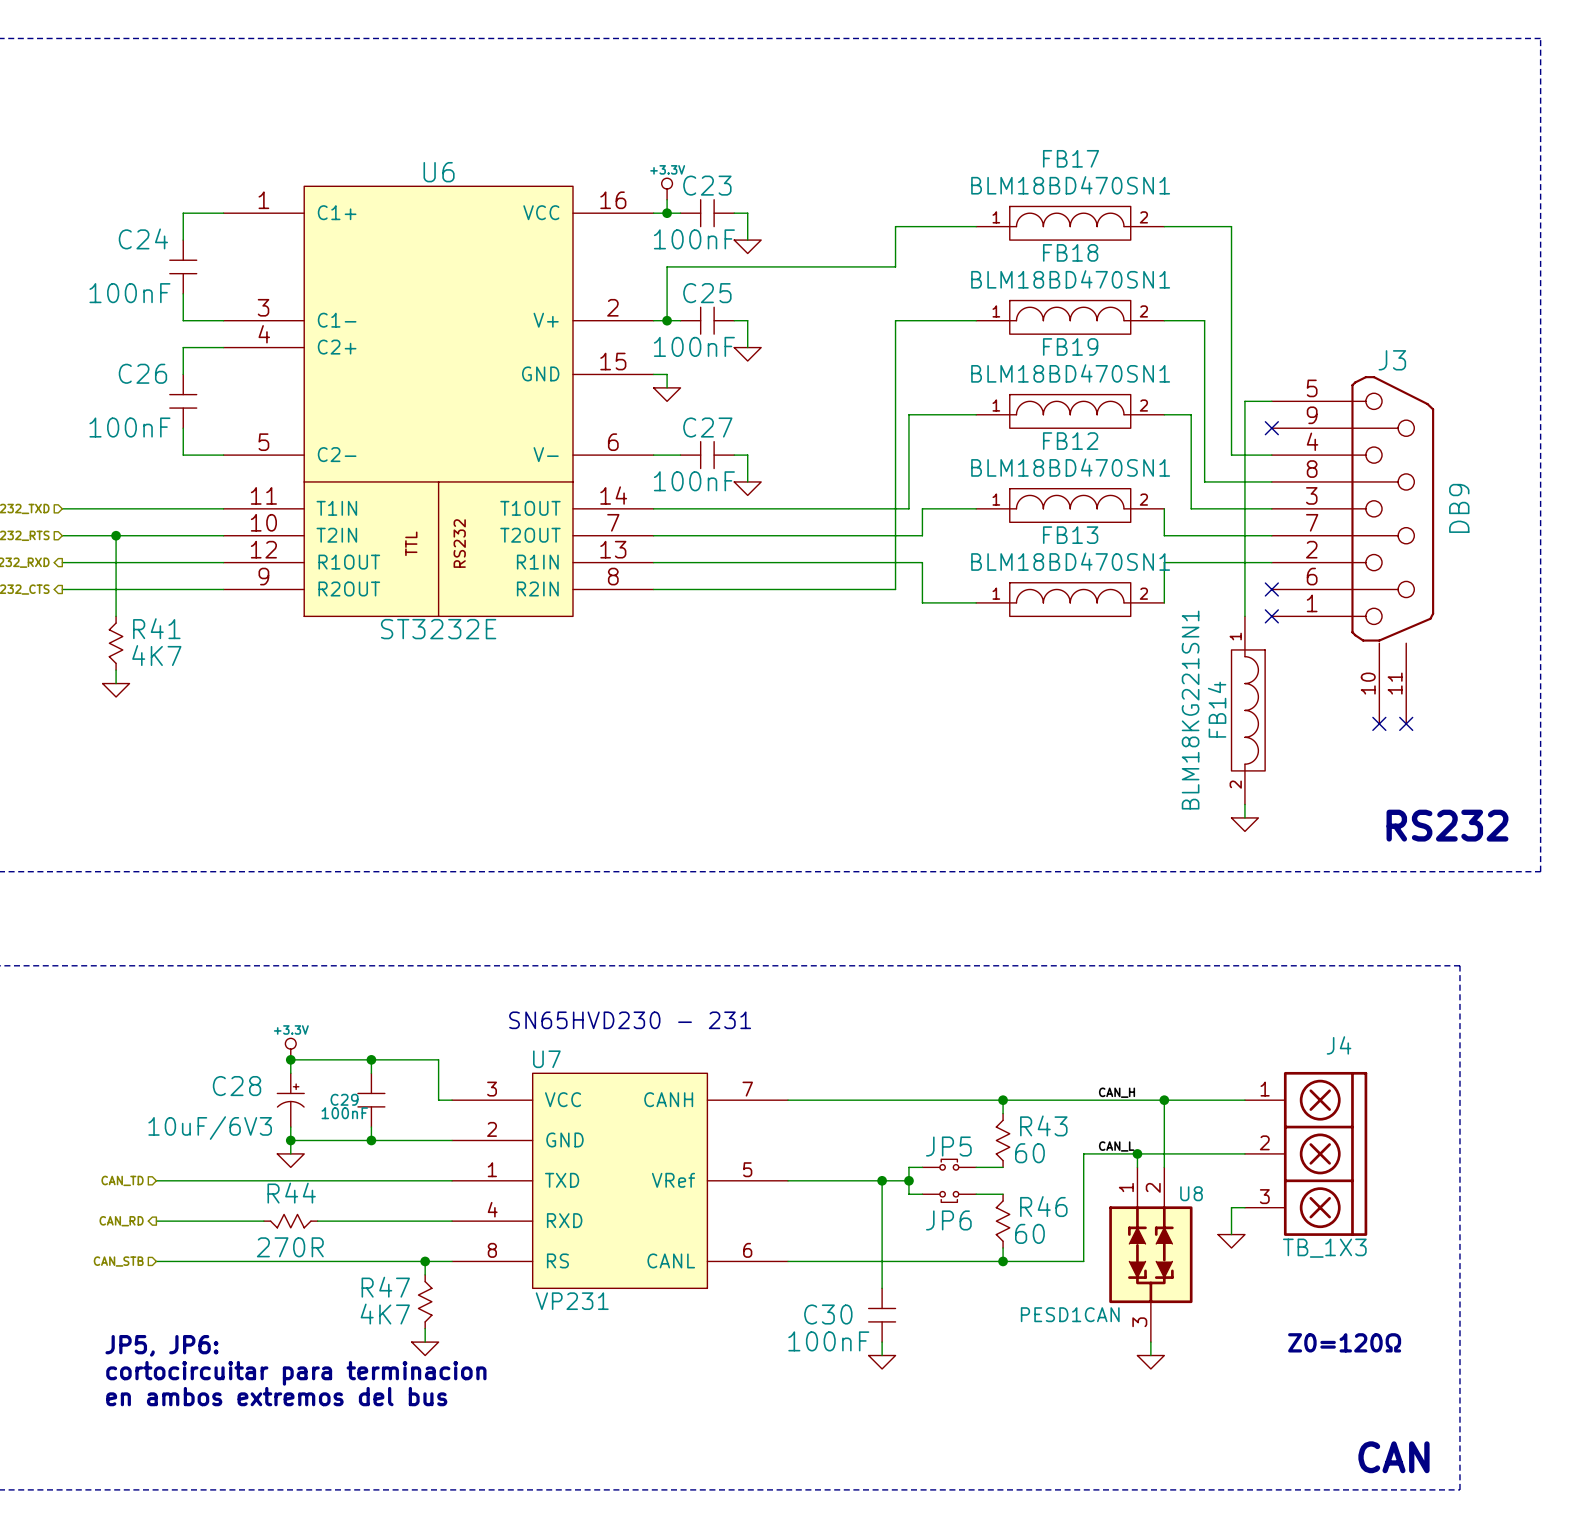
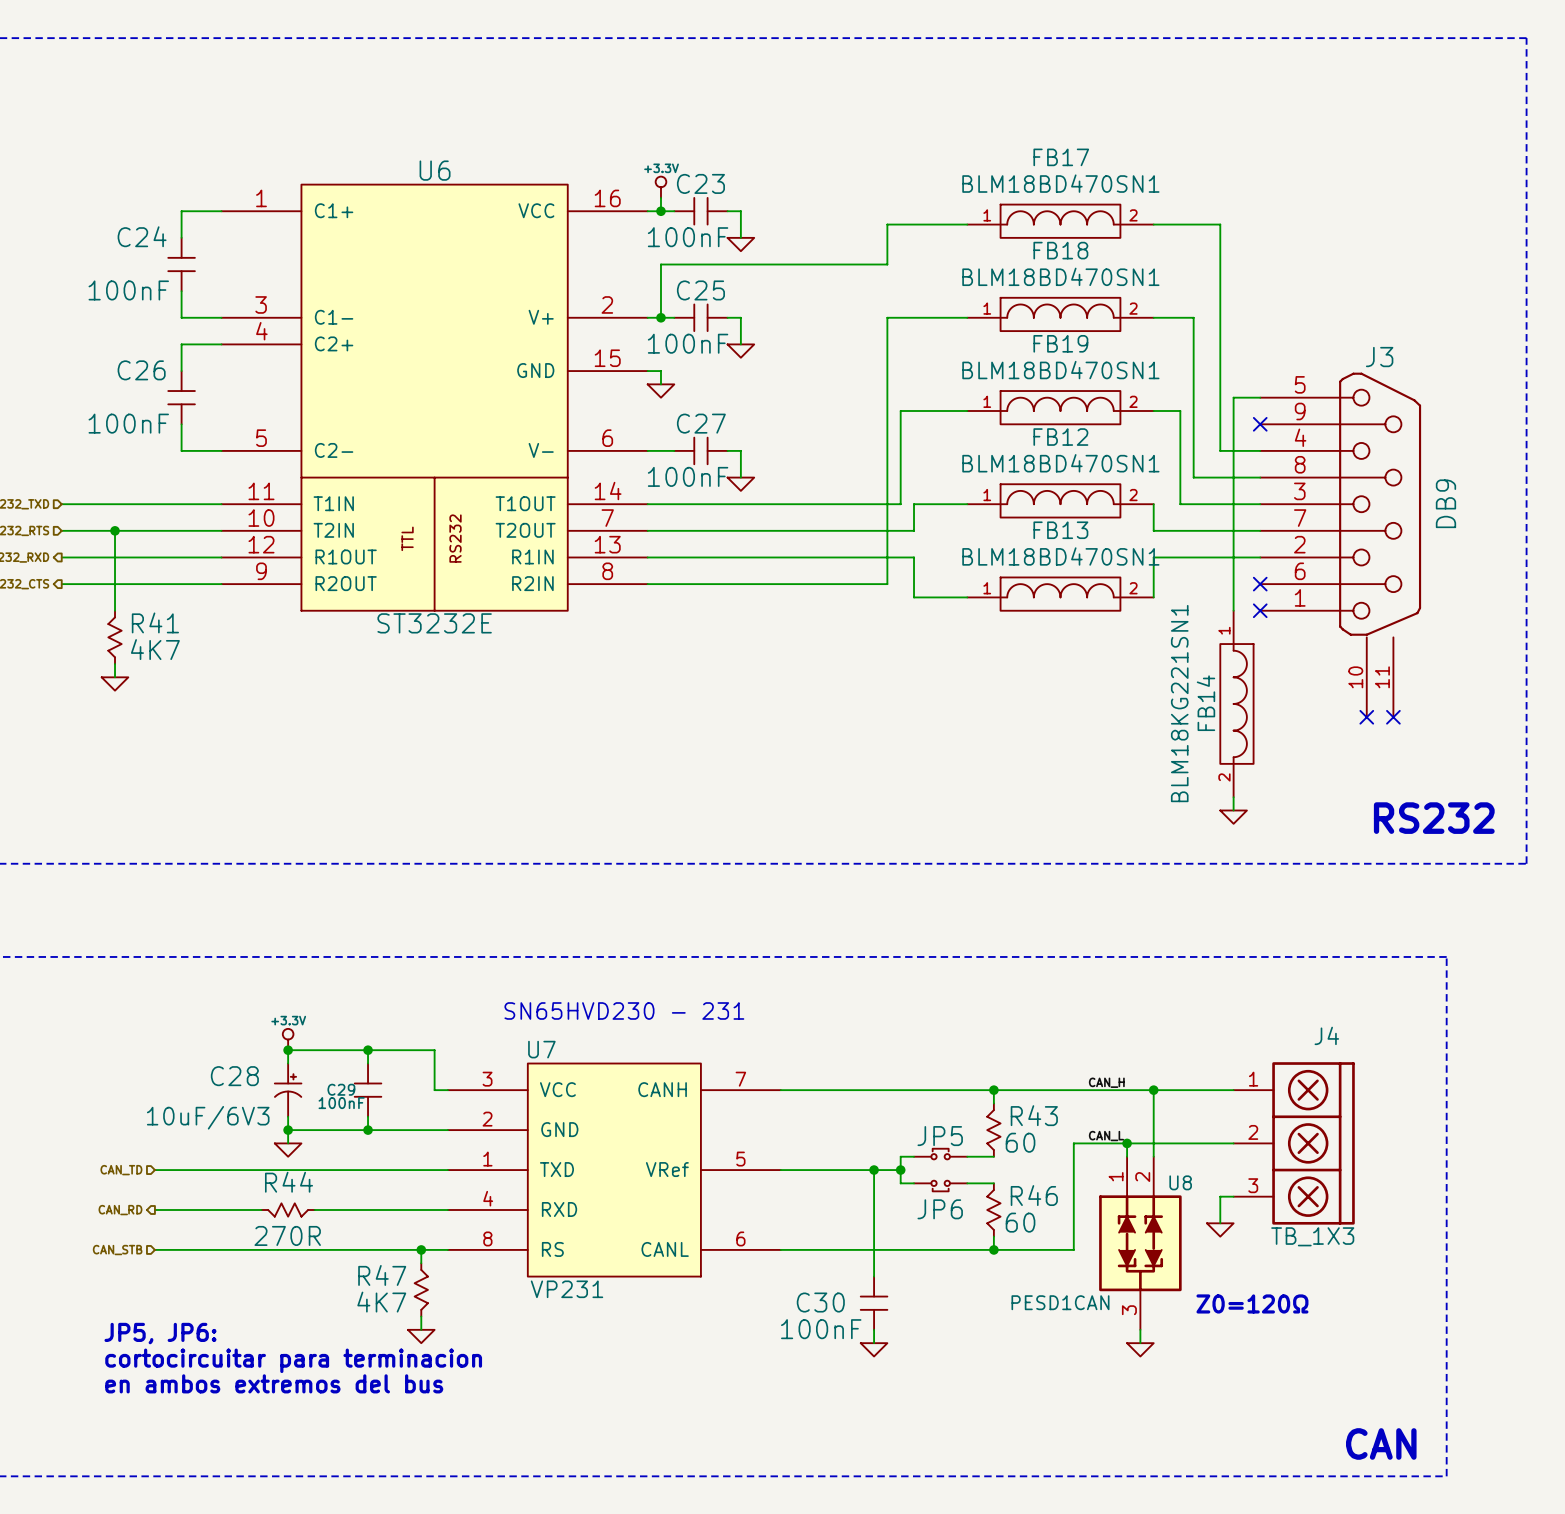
text position: Z0=120Ω (1344, 1342) -> Z0=120Ω (1252, 1303)

